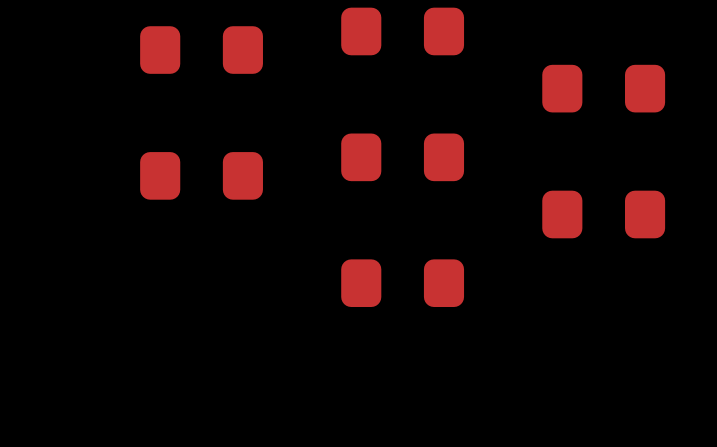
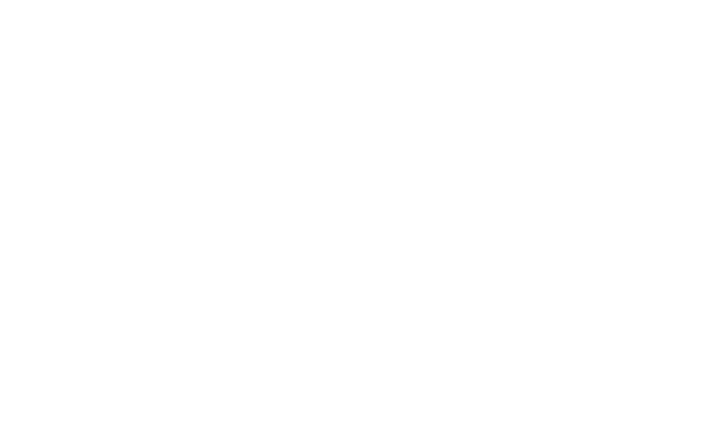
part: (402, 31) -> none
part: (201, 50) -> none
part: (603, 88) -> none
part: (402, 157) -> none
part: (201, 175) -> none
part: (603, 214) -> none
part: (402, 283) -> none

